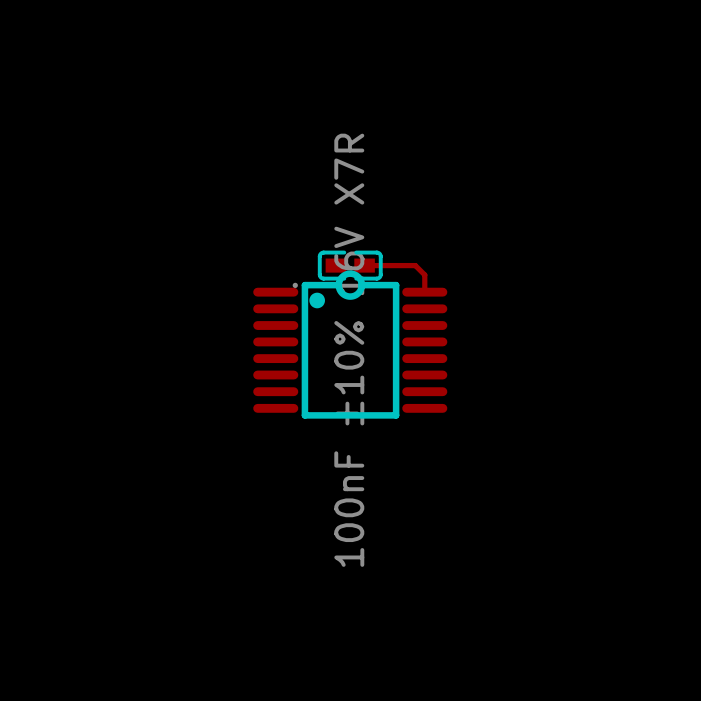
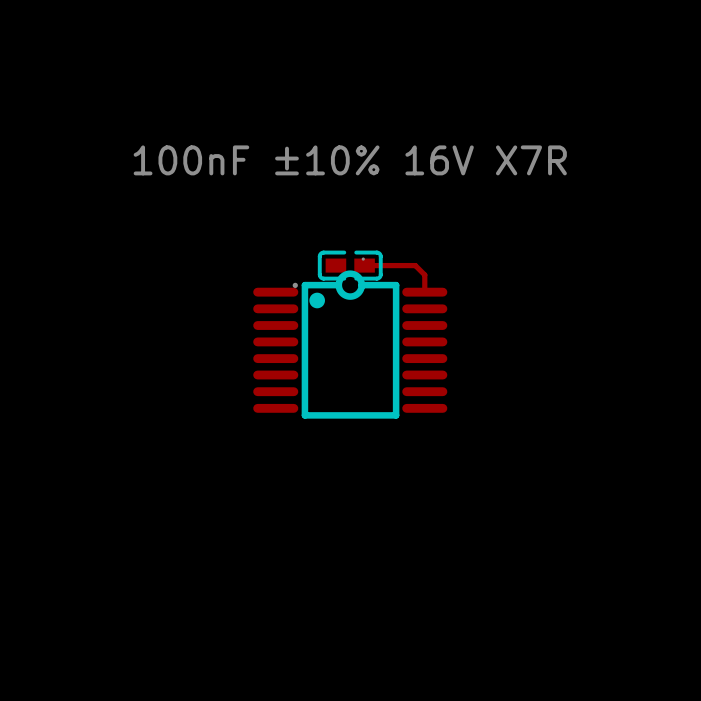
part value rotation: 0° (349, 350) -> 90° clockwise (350, 160)

